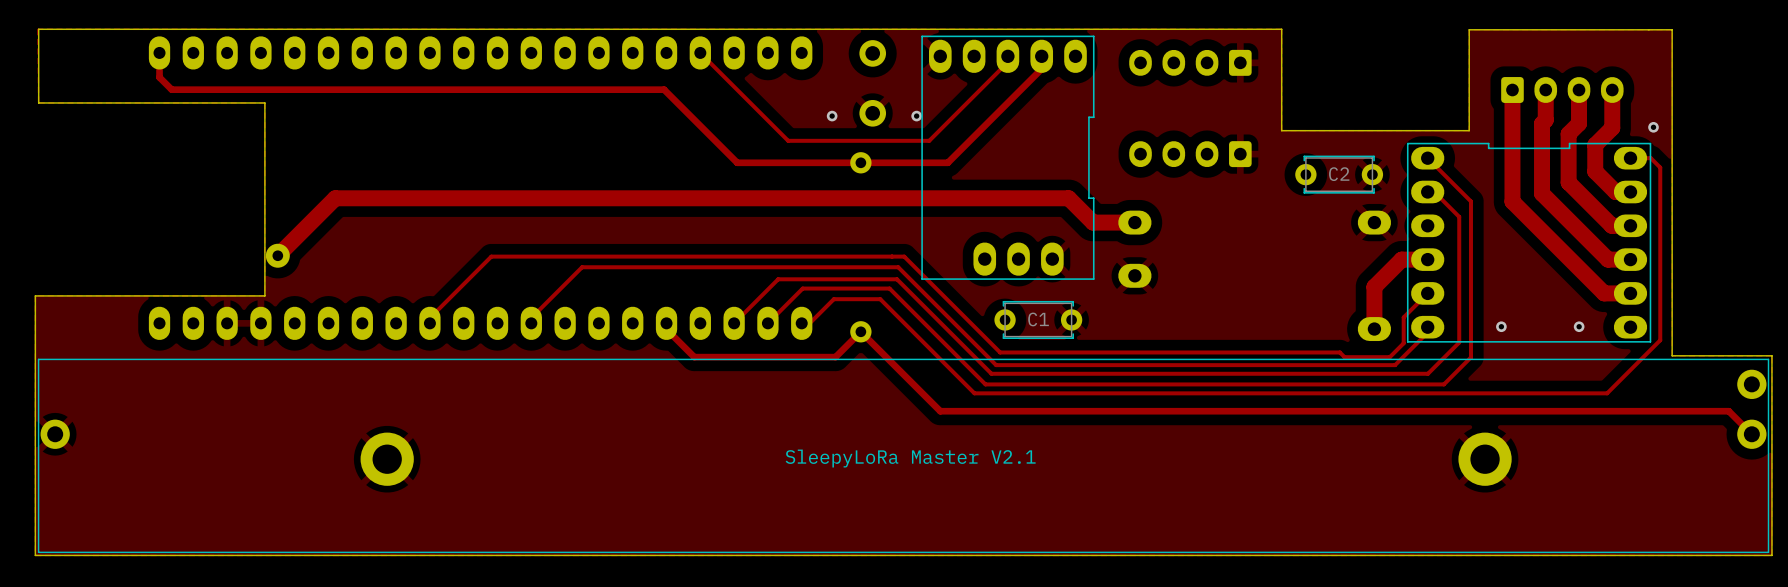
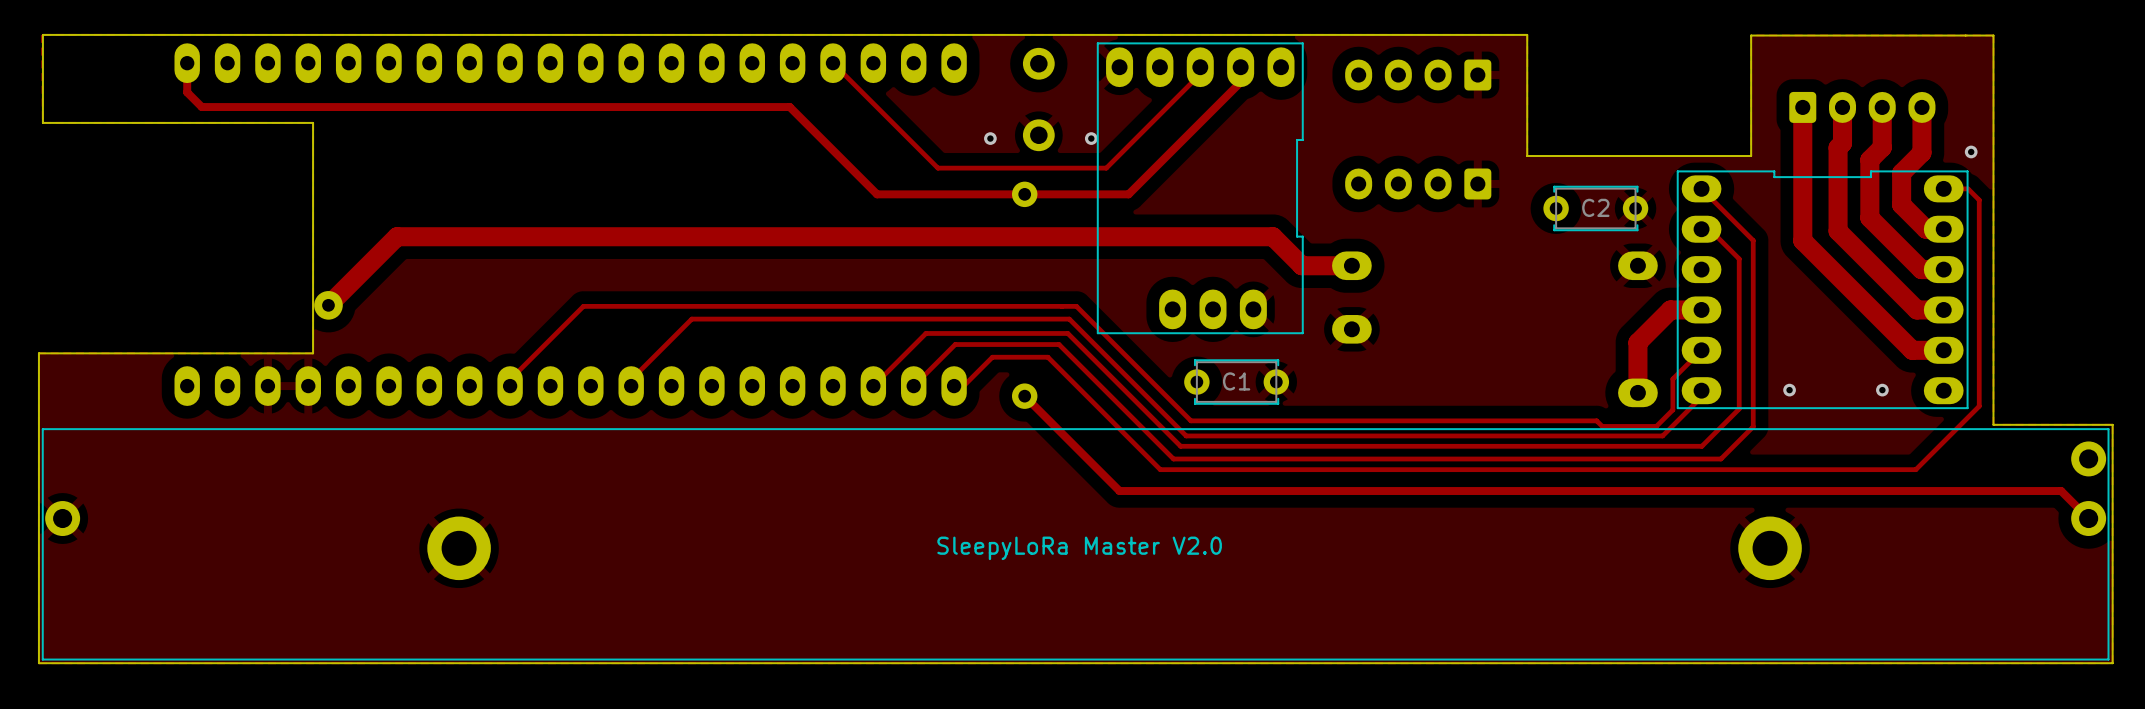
track: (666, 323) (666, 329) (694, 357) (835, 357) (860, 331) -> none
text: SleepyLoRa Master V2.1 (910, 458) -> SleepyLoRa Master V2.0 (1079, 548)

